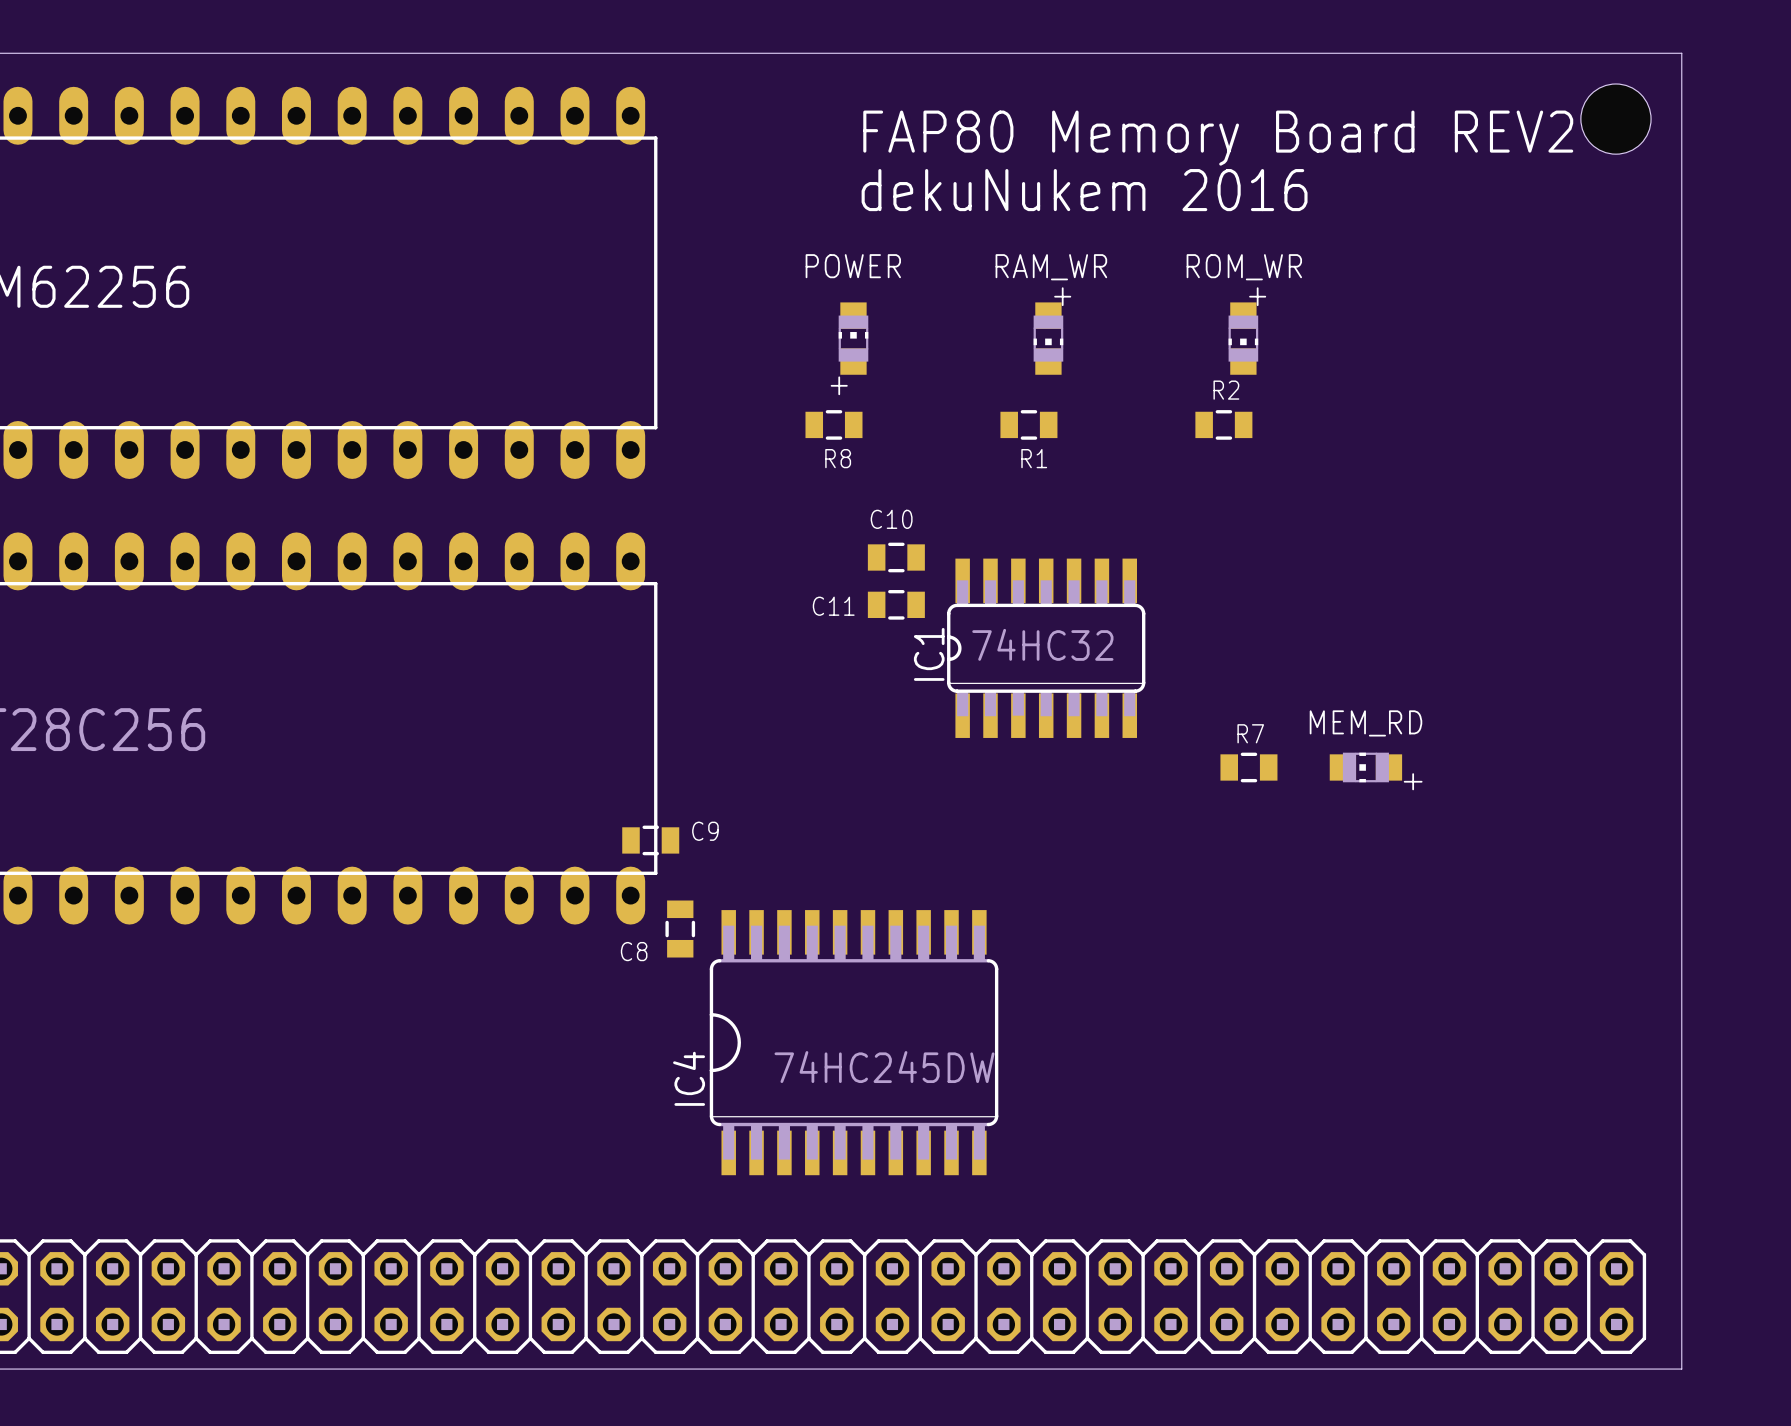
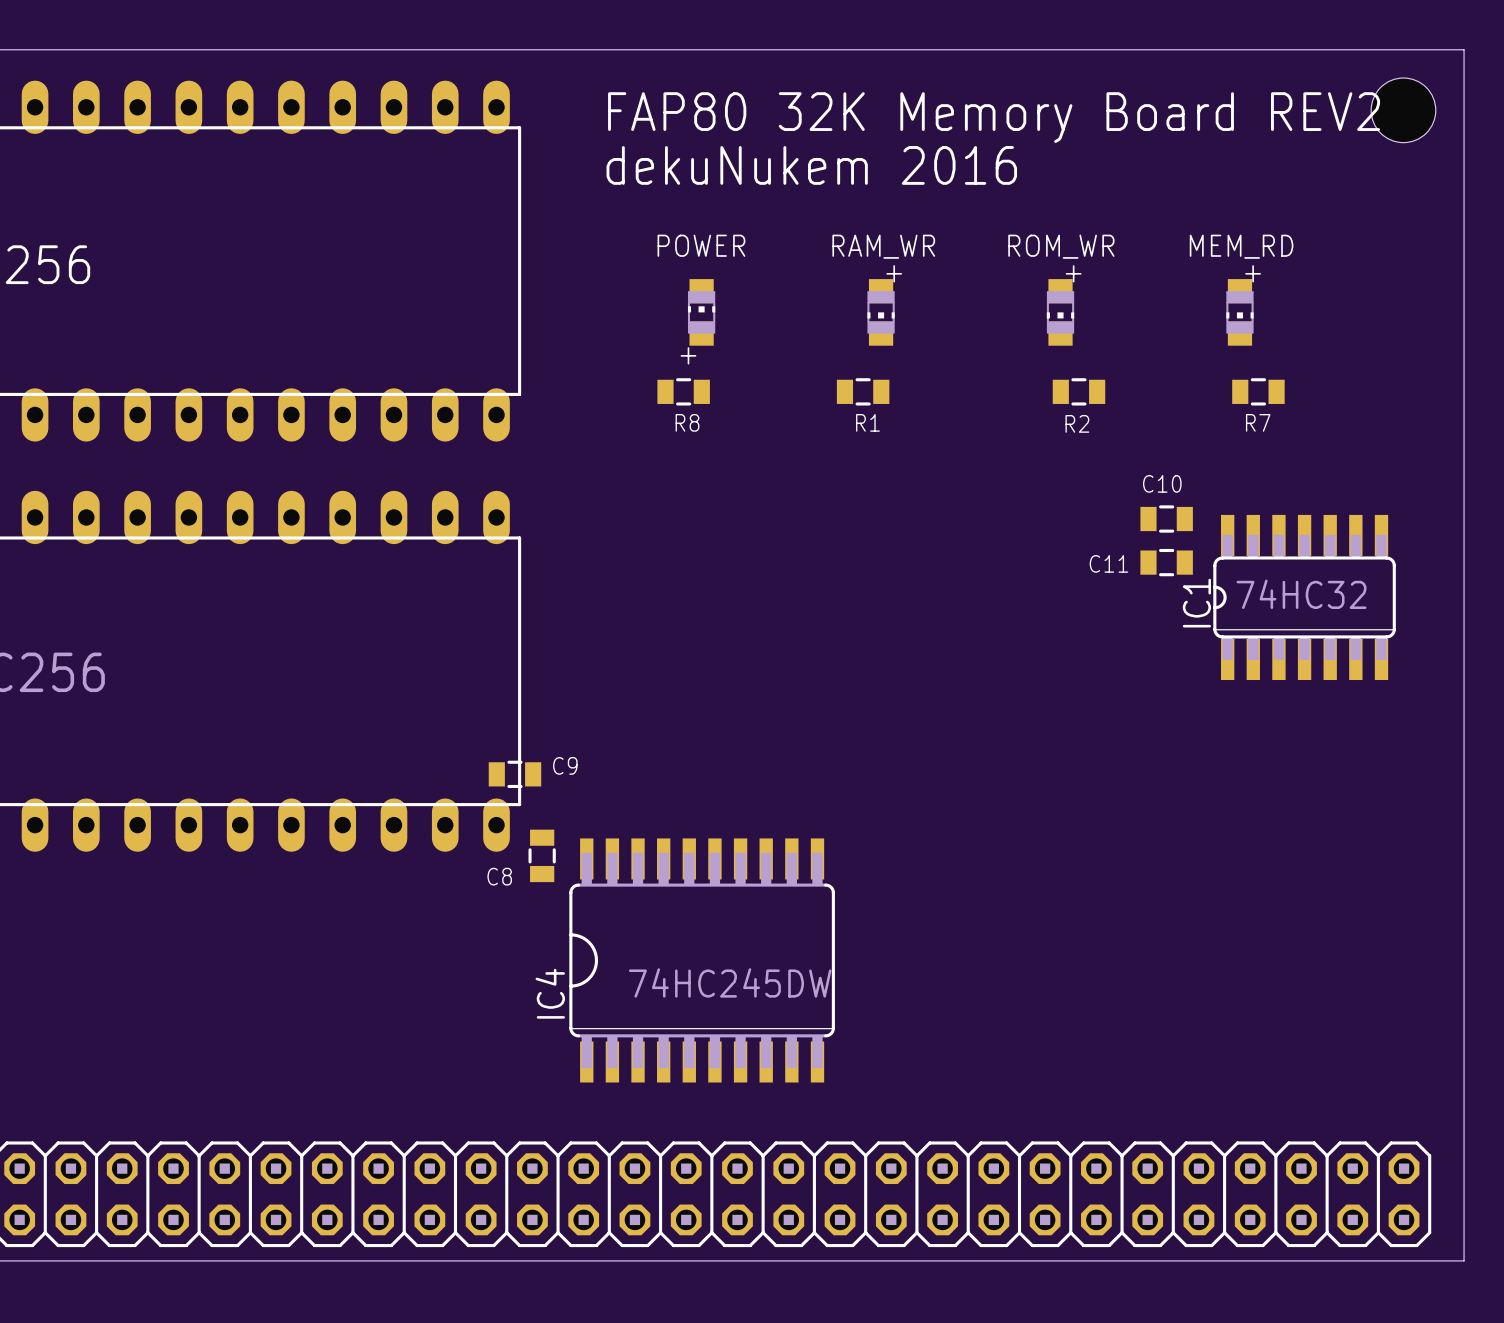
text: FAP80 Memory Board REV2 (1218, 138) -> FAP80 32K Memory Board REV2 (994, 117)
text position: dekuNukem 2016 (1084, 190) -> dekuNukem 2016 (811, 165)
part: none -> (1239, 312)
R2 name position: R2 (1226, 390) -> R2 (1077, 423)
R2 position: (1223, 424) -> (1078, 391)
C10 position: (896, 557) -> (1166, 519)
C11 position: (896, 604) -> (1166, 562)
IC1 position: (1046, 648) -> (1304, 597)
text position: MEM_RD (1365, 723) -> MEM_RD (1241, 246)
R7 name position: R7 (1250, 733) -> R7 (1258, 422)
R7 position: (1248, 767) -> (1258, 391)
part: (1365, 767) -> none

